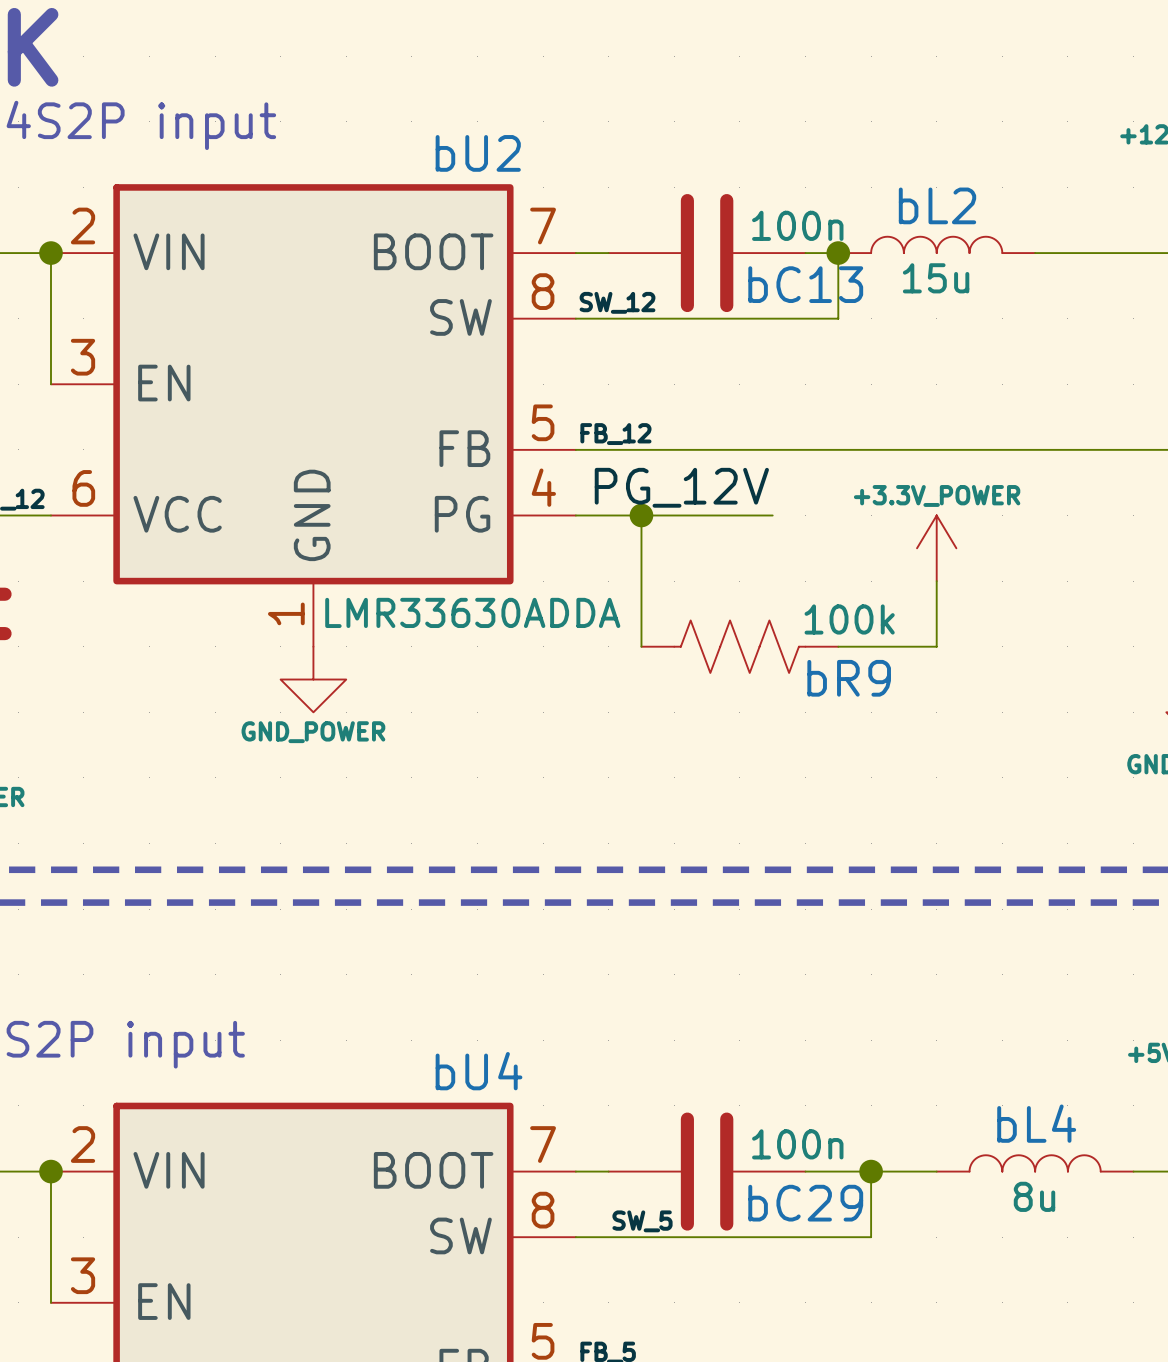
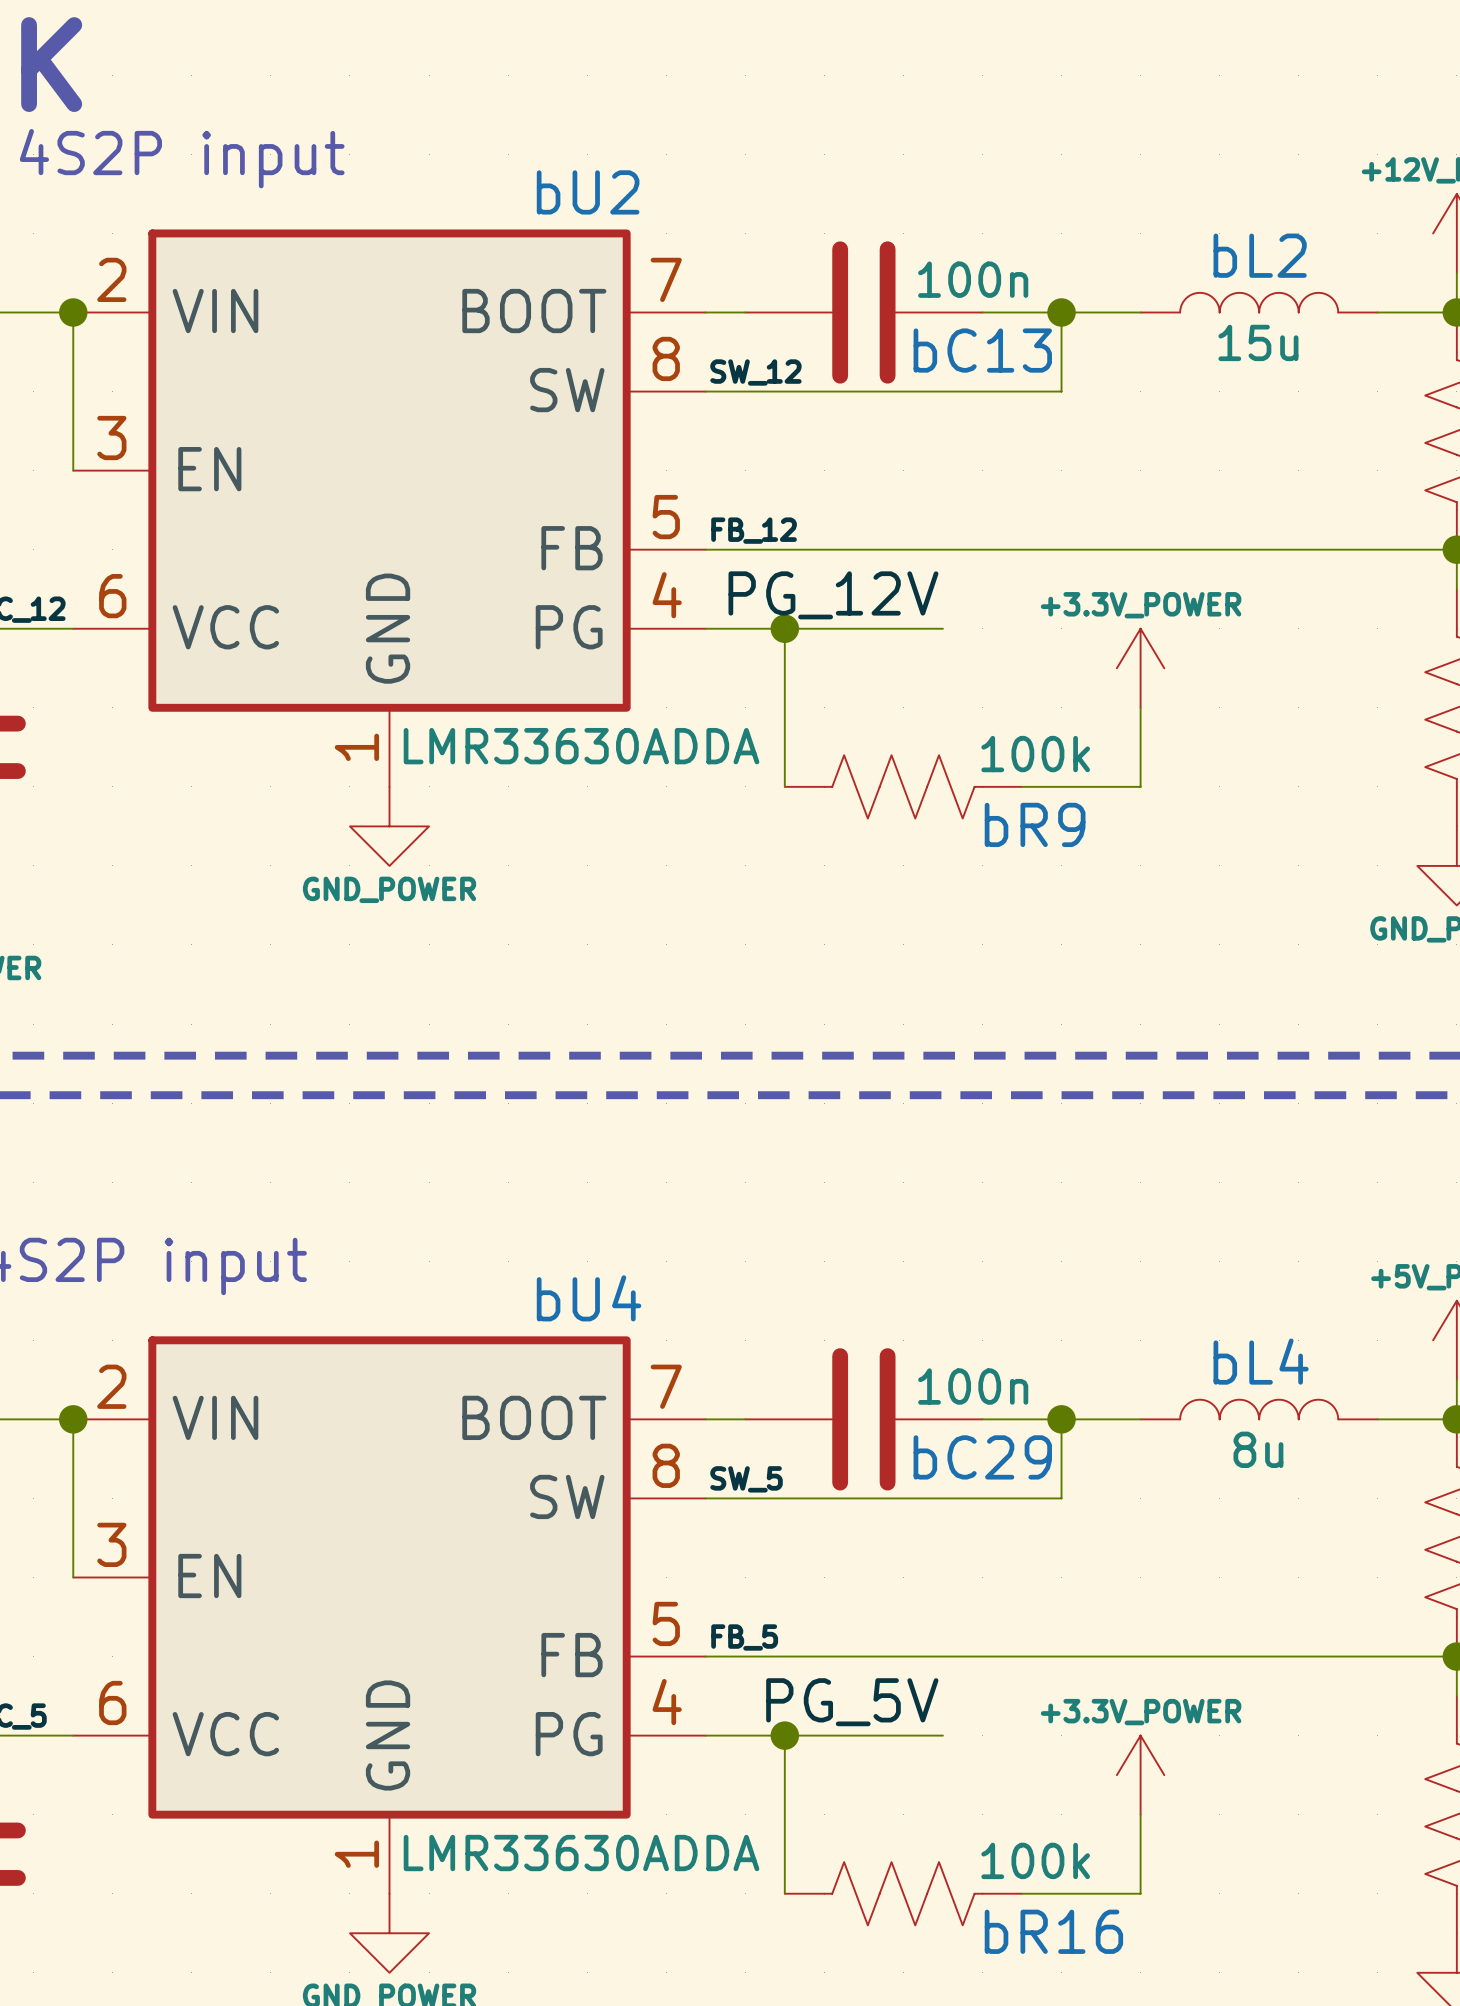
bL2 position: (936, 244) -> (1259, 302)
wire: (838, 253) (838, 318) -> (1061, 312) (1061, 391) (1022, 391)
junction position: (838, 253) -> (1061, 312)
wire: (1035, 253) (1133, 253) -> (1022, 312) (1140, 312)
label position: SW_5 (642, 1221) -> SW_5 (746, 1479)

